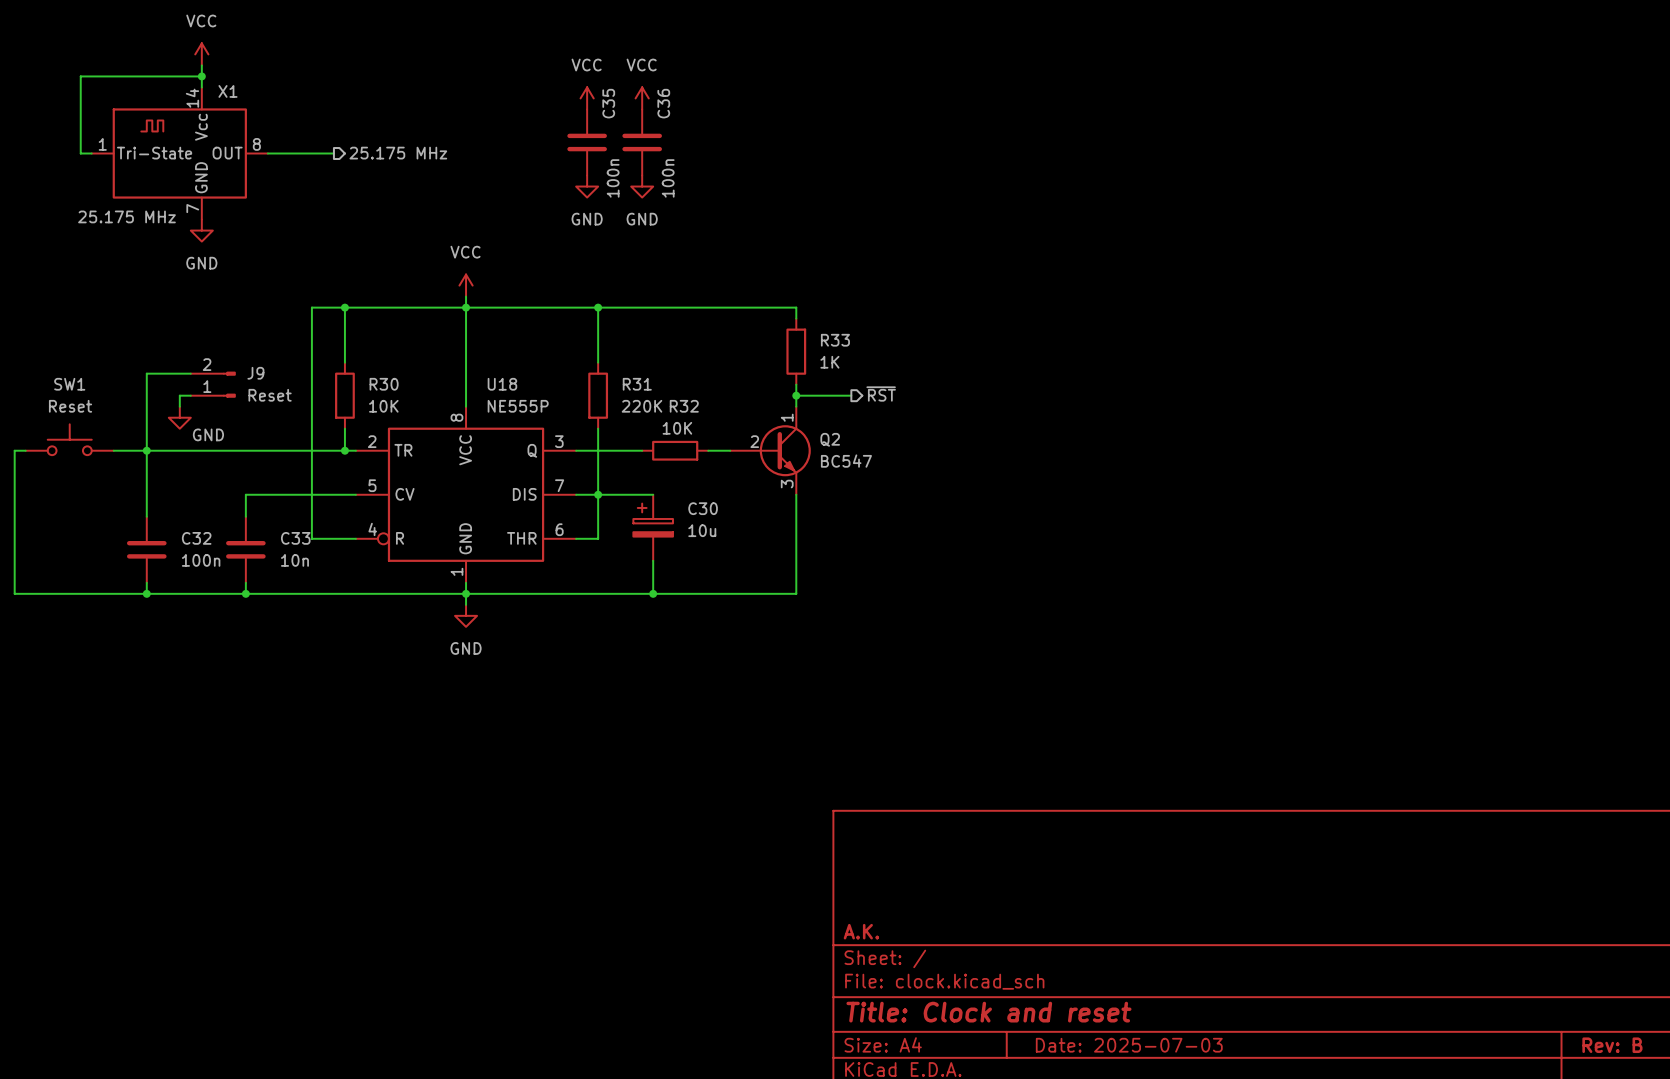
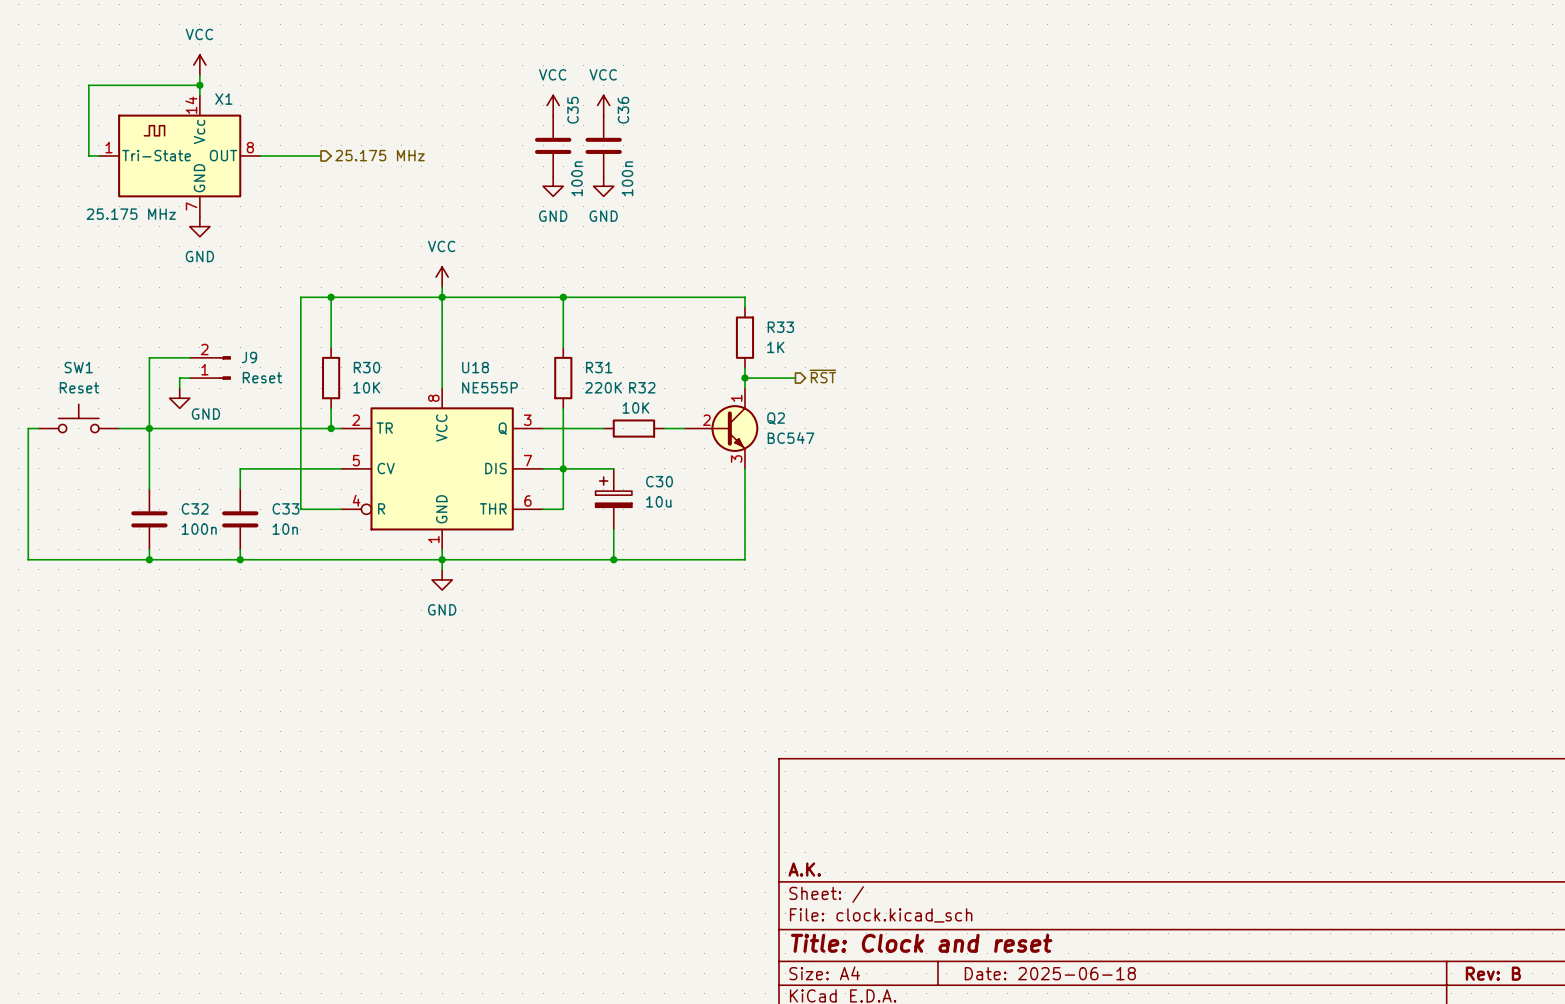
title block: Date: 2025-07-03 (1129, 1045) -> Date: 2025-06-18 (1050, 973)

